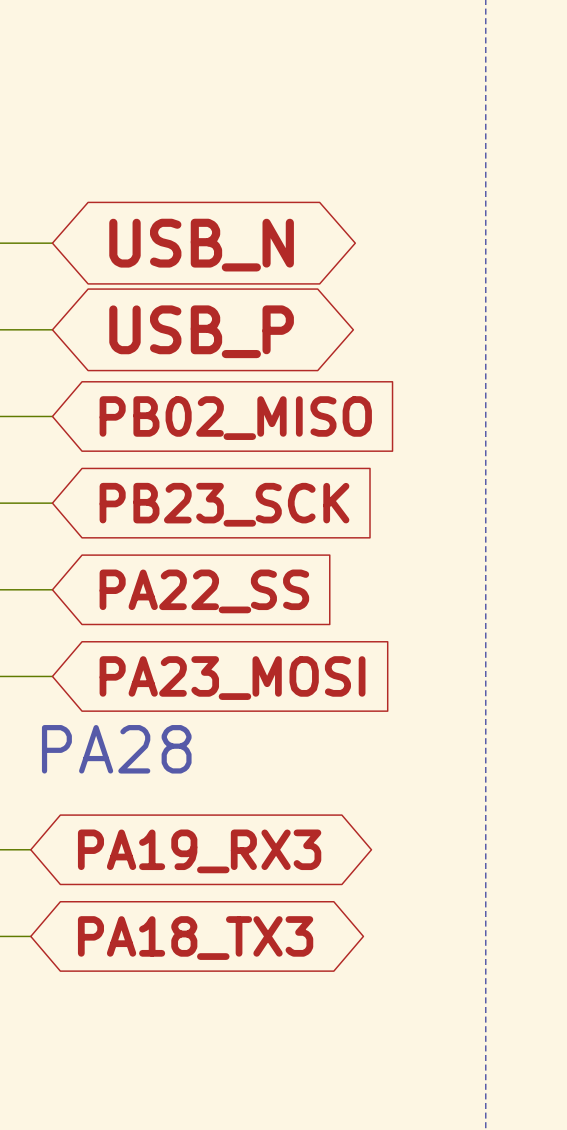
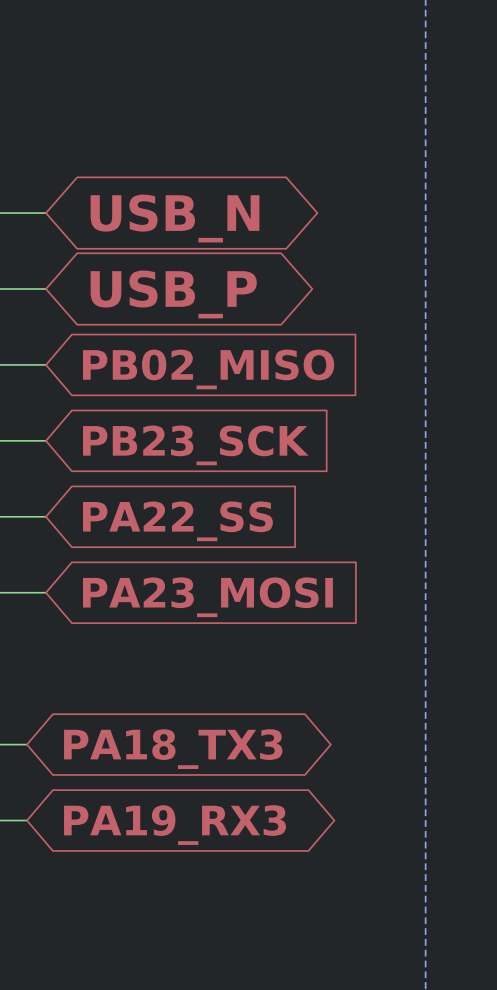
text: PA28 (116, 749) -> none
global label: PA19_RX3 (199, 851) -> PA18_TX3 (173, 749)
global label: PA18_TX3 (195, 938) -> PA19_RX3 (175, 825)

